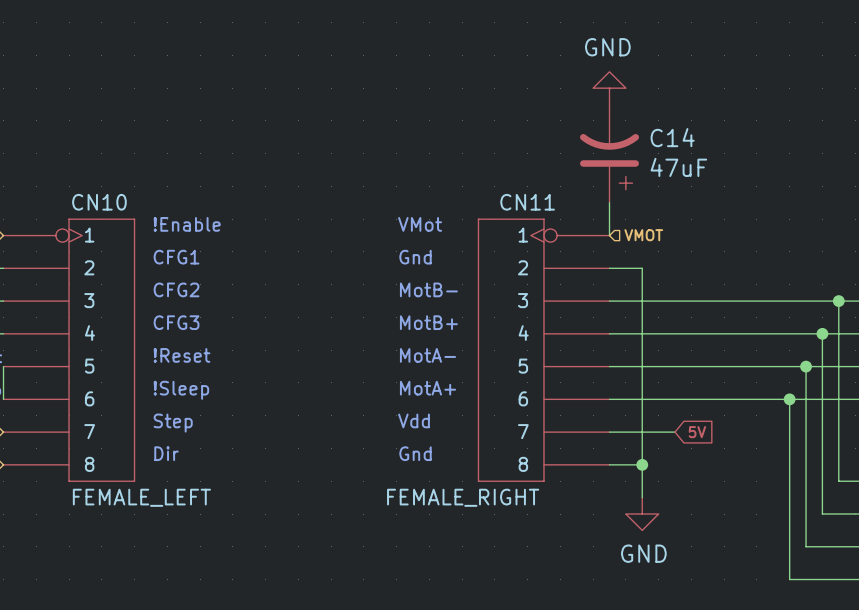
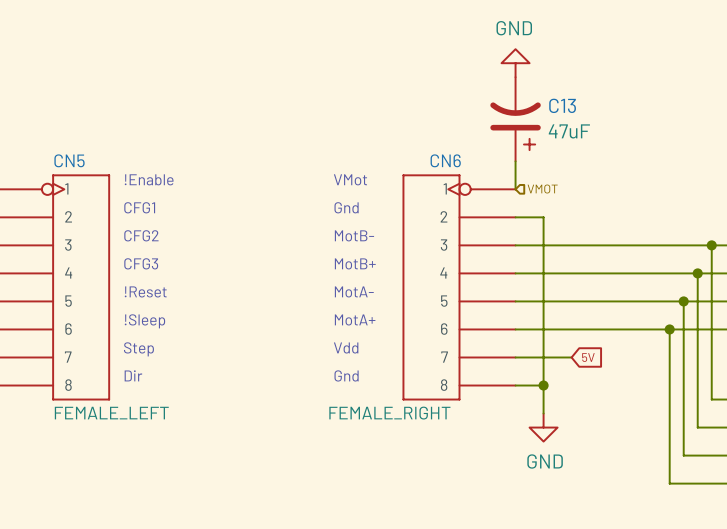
C14 name: C14 (672, 137) -> C13 (562, 105)
CN10 name: CN10 (99, 202) -> CN5 (69, 160)
CN11 name: CN11 (527, 202) -> CN6 (445, 160)

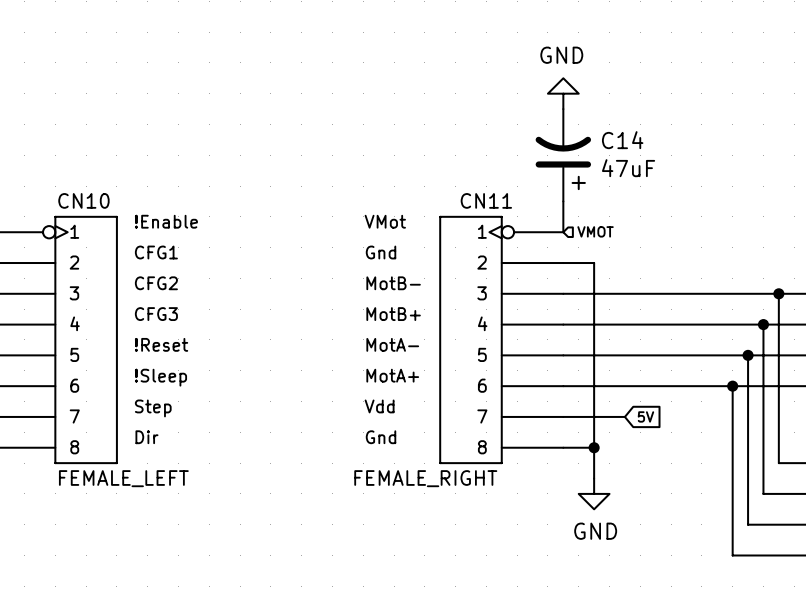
C13 name: C13 (562, 105) -> C14 (622, 140)
CN5 name: CN5 (69, 160) -> CN10 (83, 200)
CN6 name: CN6 (445, 160) -> CN11 (486, 200)

